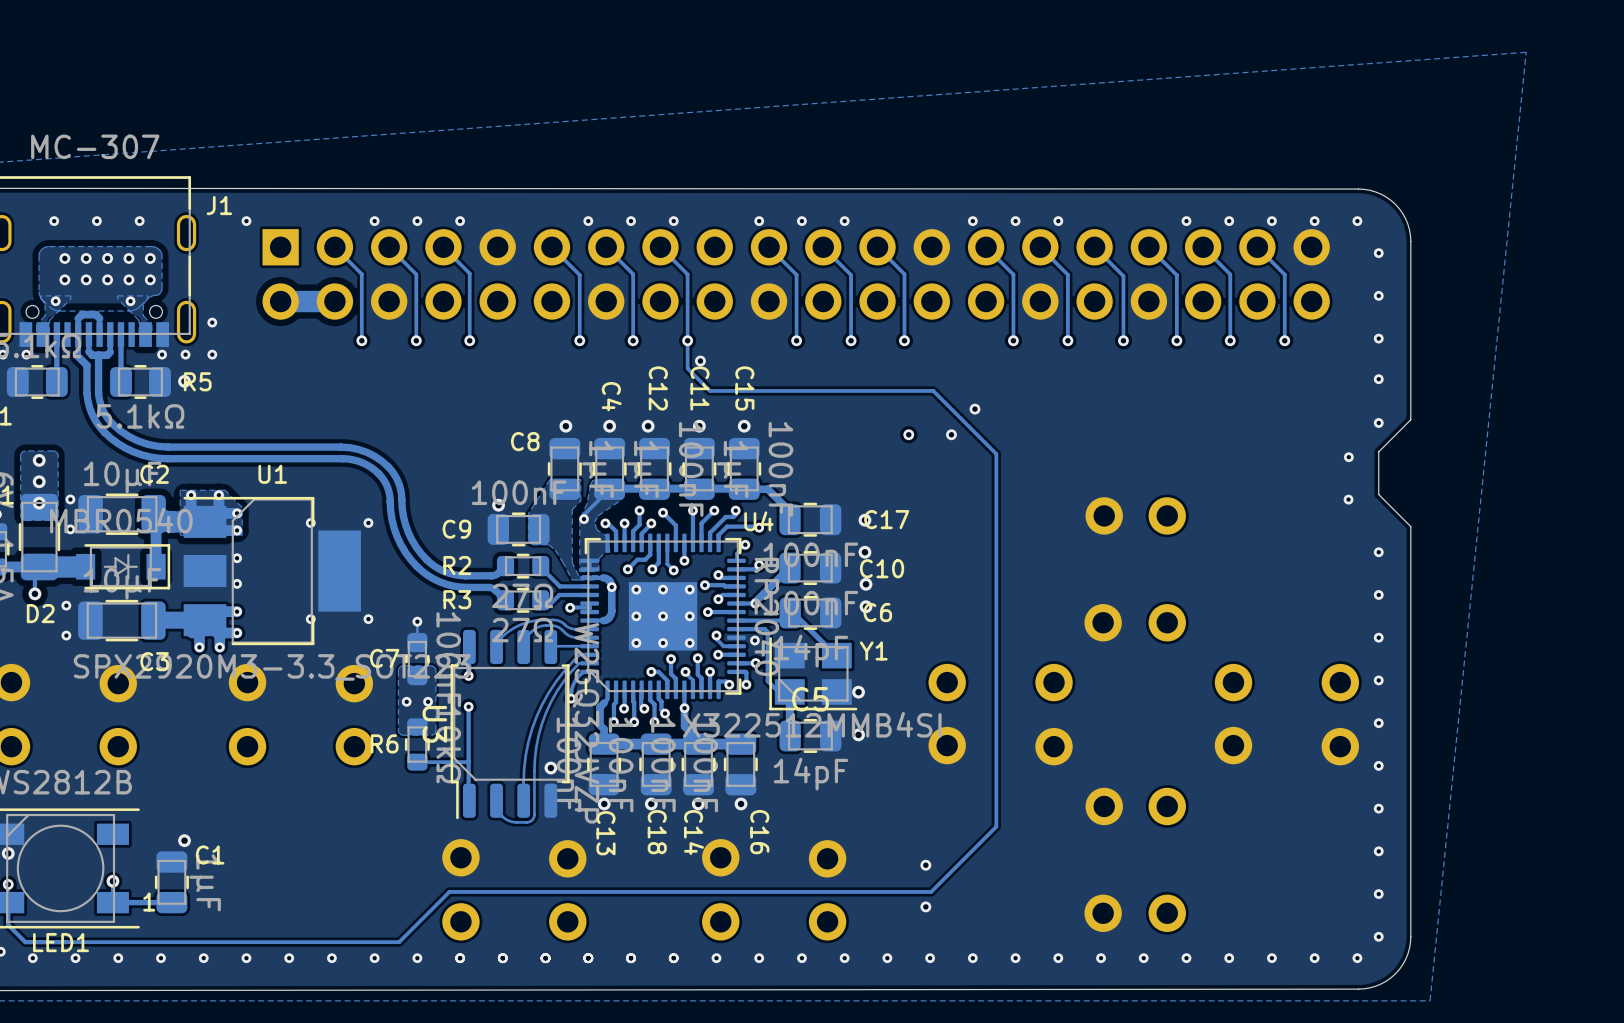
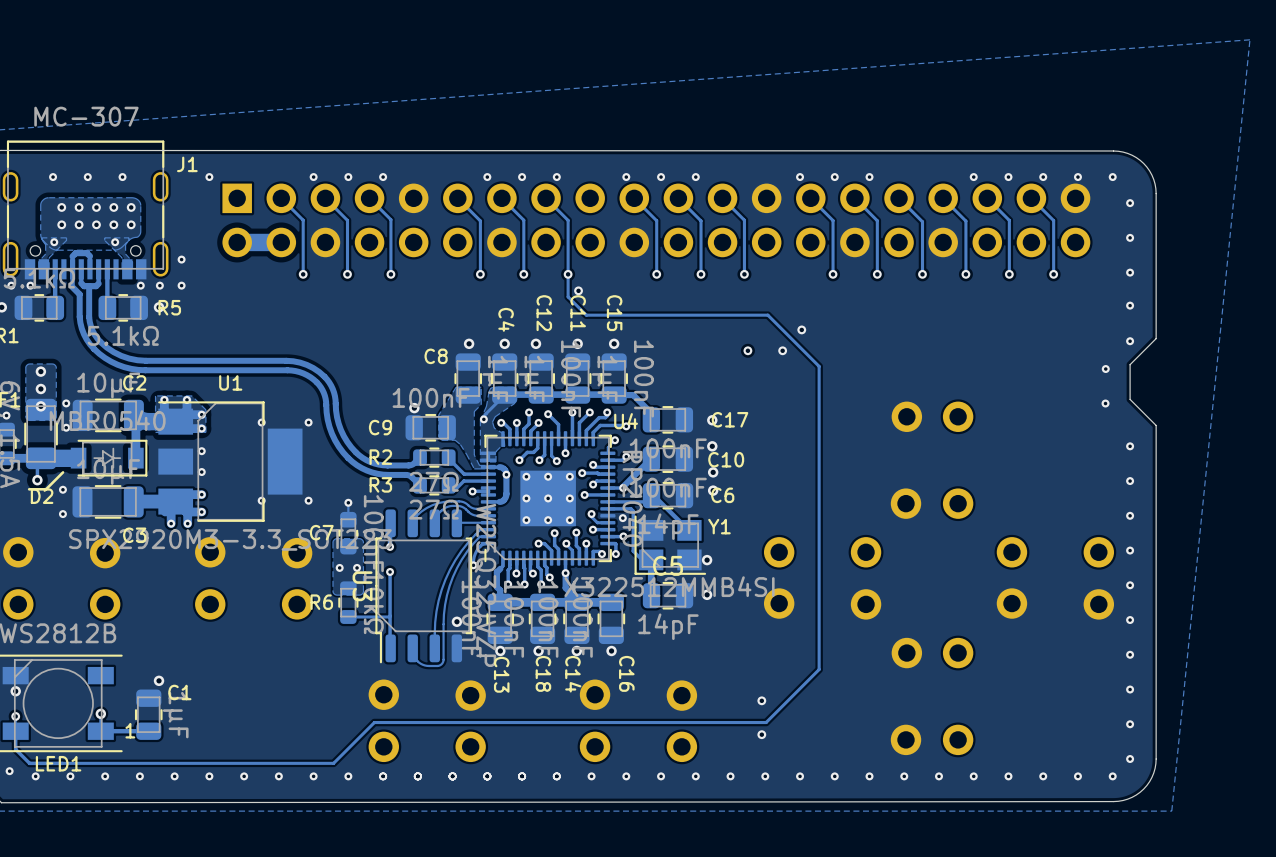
line: none -> (63, 472) (46, 489) (29, 489)

